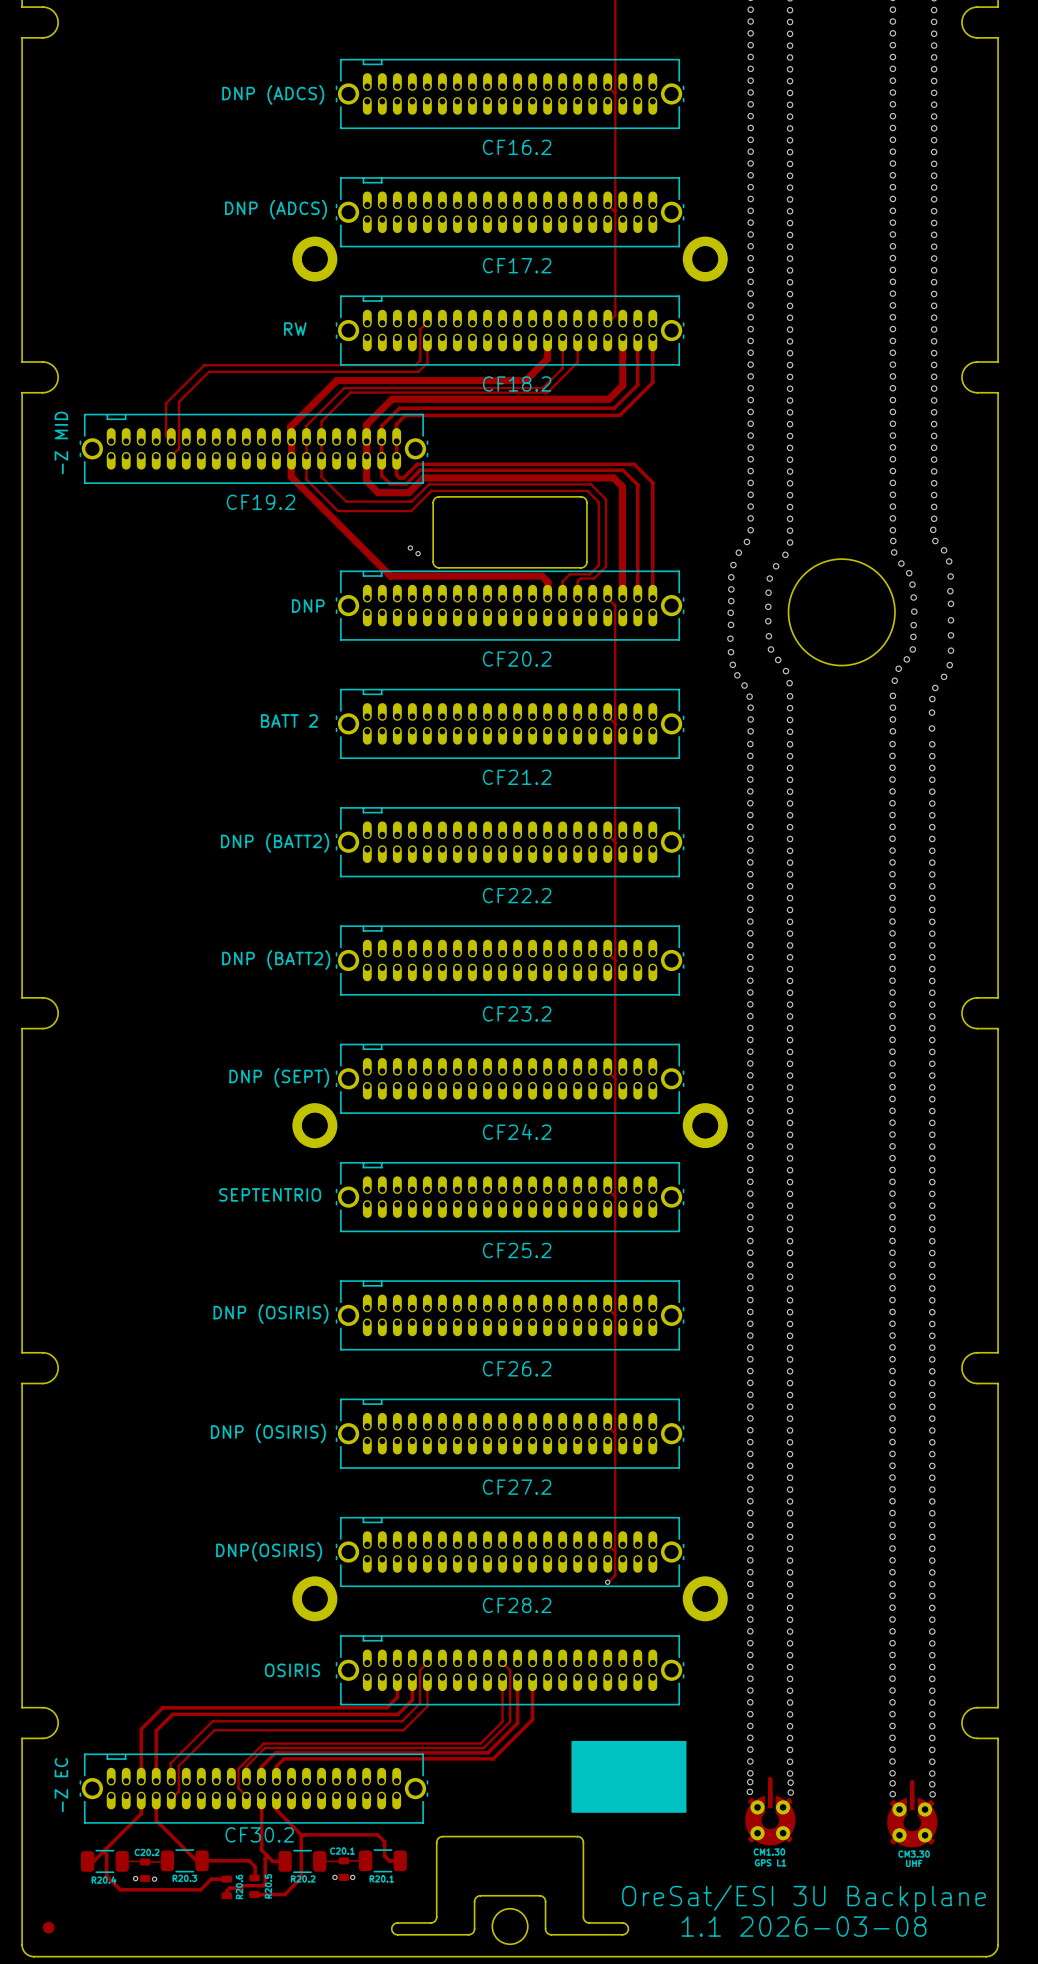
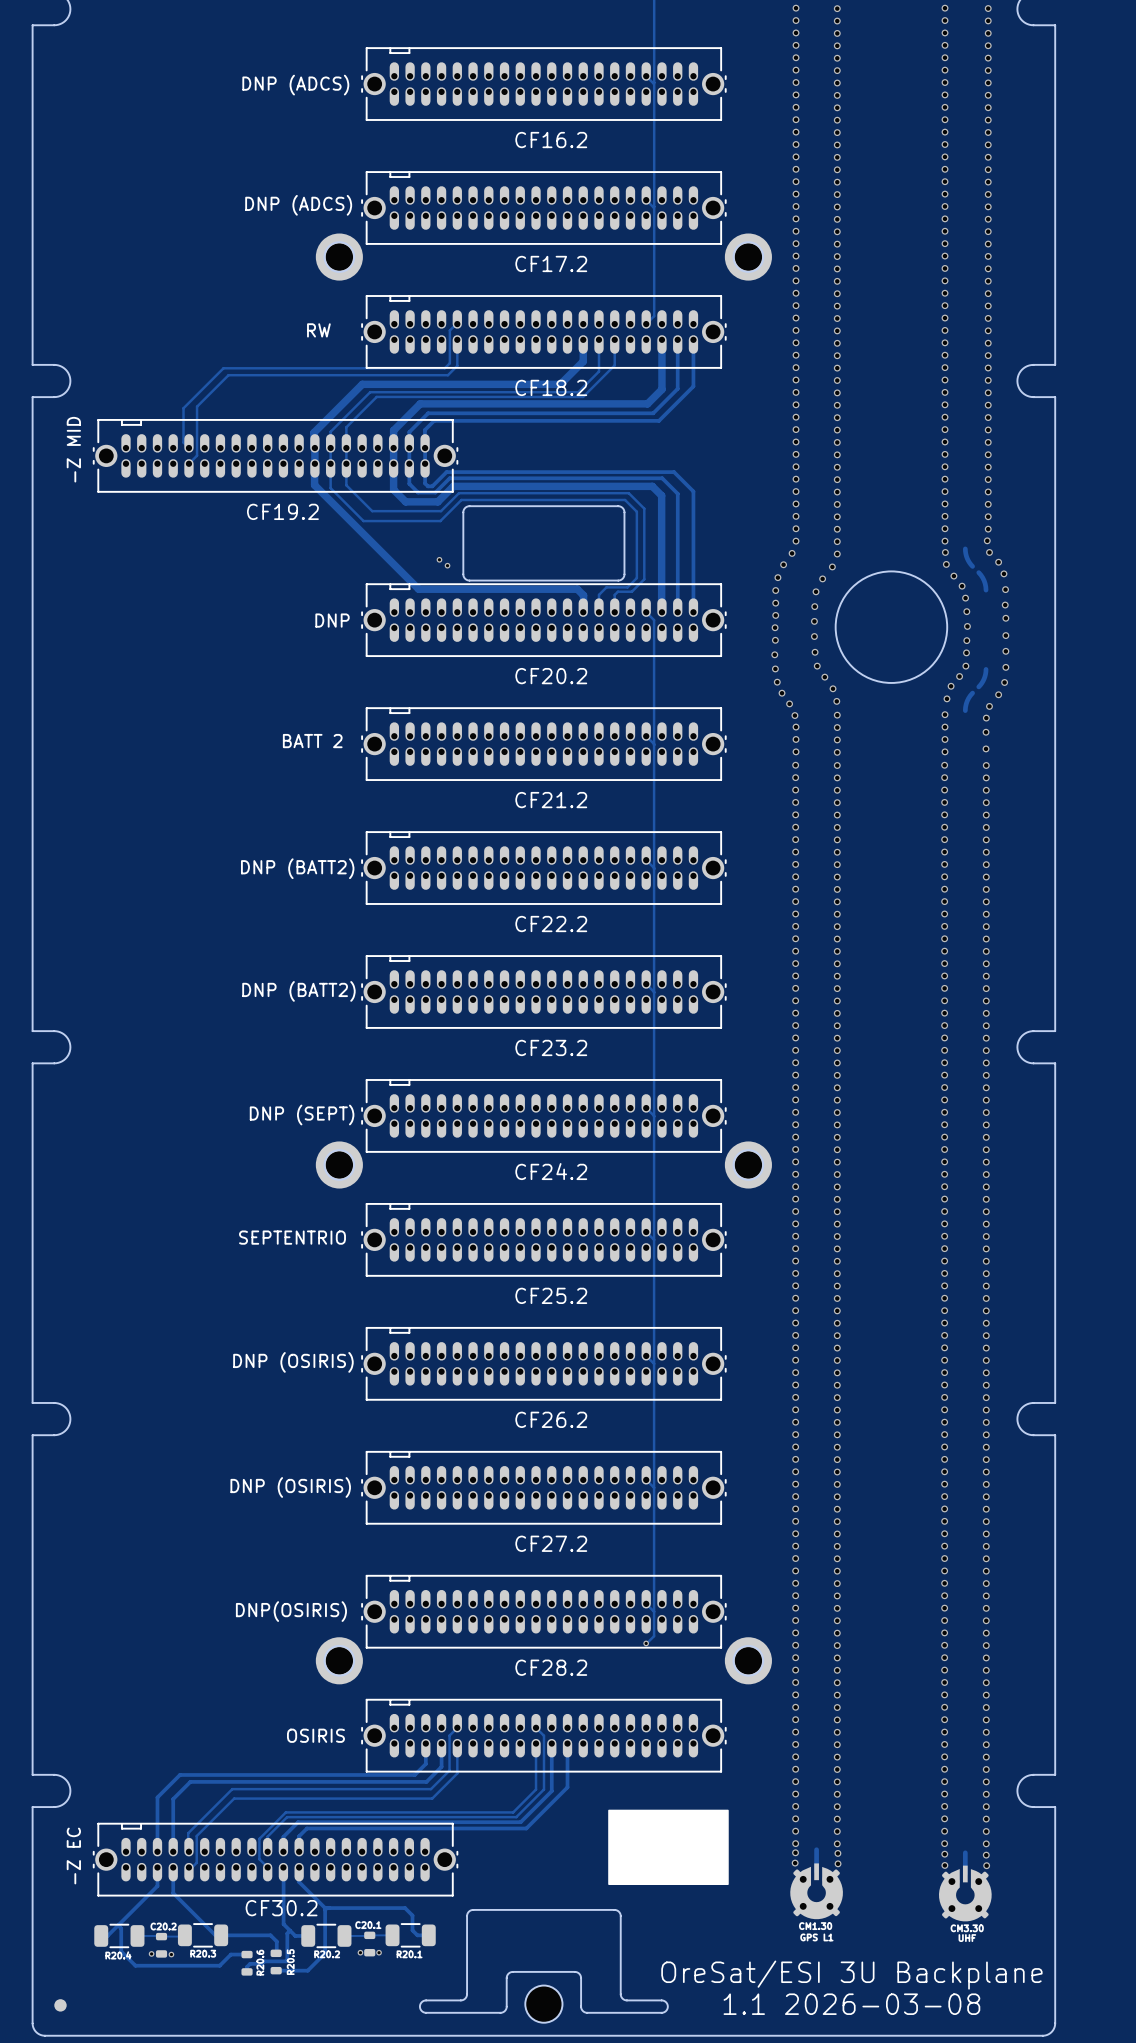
track: none -> (965, 548) (967, 558) (972, 566)
track: none -> (978, 572) (984, 580) (986, 590)
track: none -> (986, 669) (984, 678) (978, 686)
track: none -> (972, 693) (967, 701) (965, 710)

